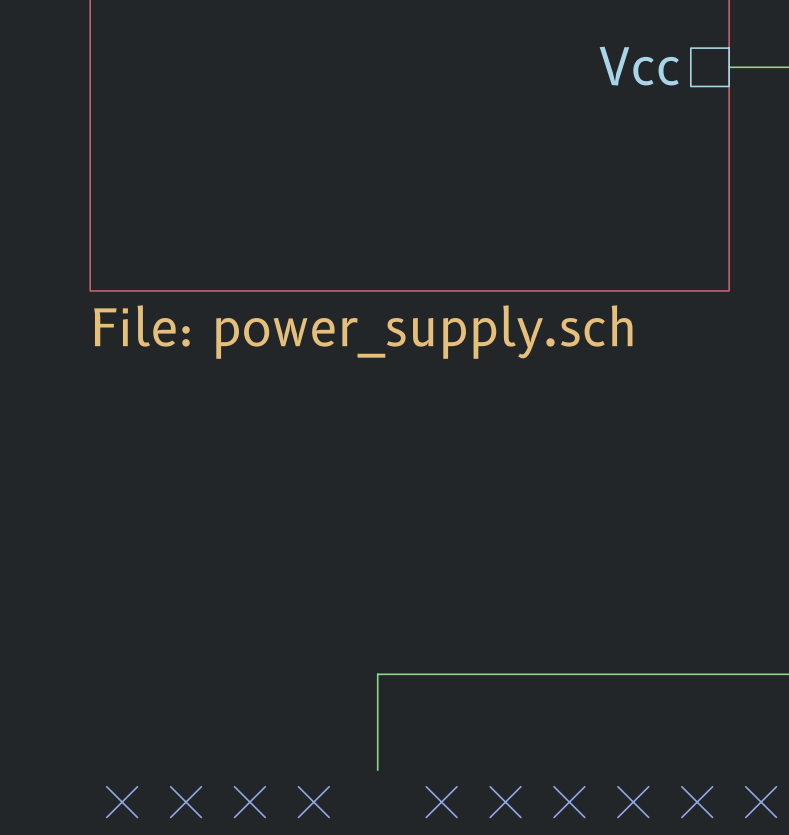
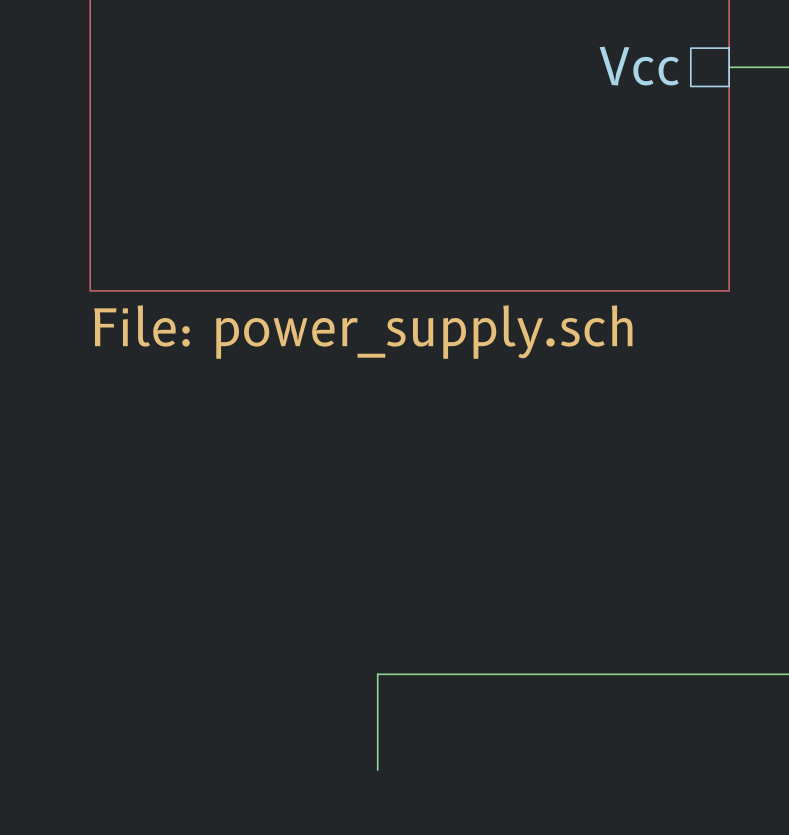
no-connect mark: (122, 802) -> none
no-connect mark: (186, 802) -> none
no-connect mark: (249, 802) -> none
no-connect mark: (313, 802) -> none
no-connect mark: (441, 802) -> none
no-connect mark: (505, 802) -> none
no-connect mark: (569, 802) -> none
no-connect mark: (633, 802) -> none
no-connect mark: (697, 802) -> none
no-connect mark: (761, 802) -> none

